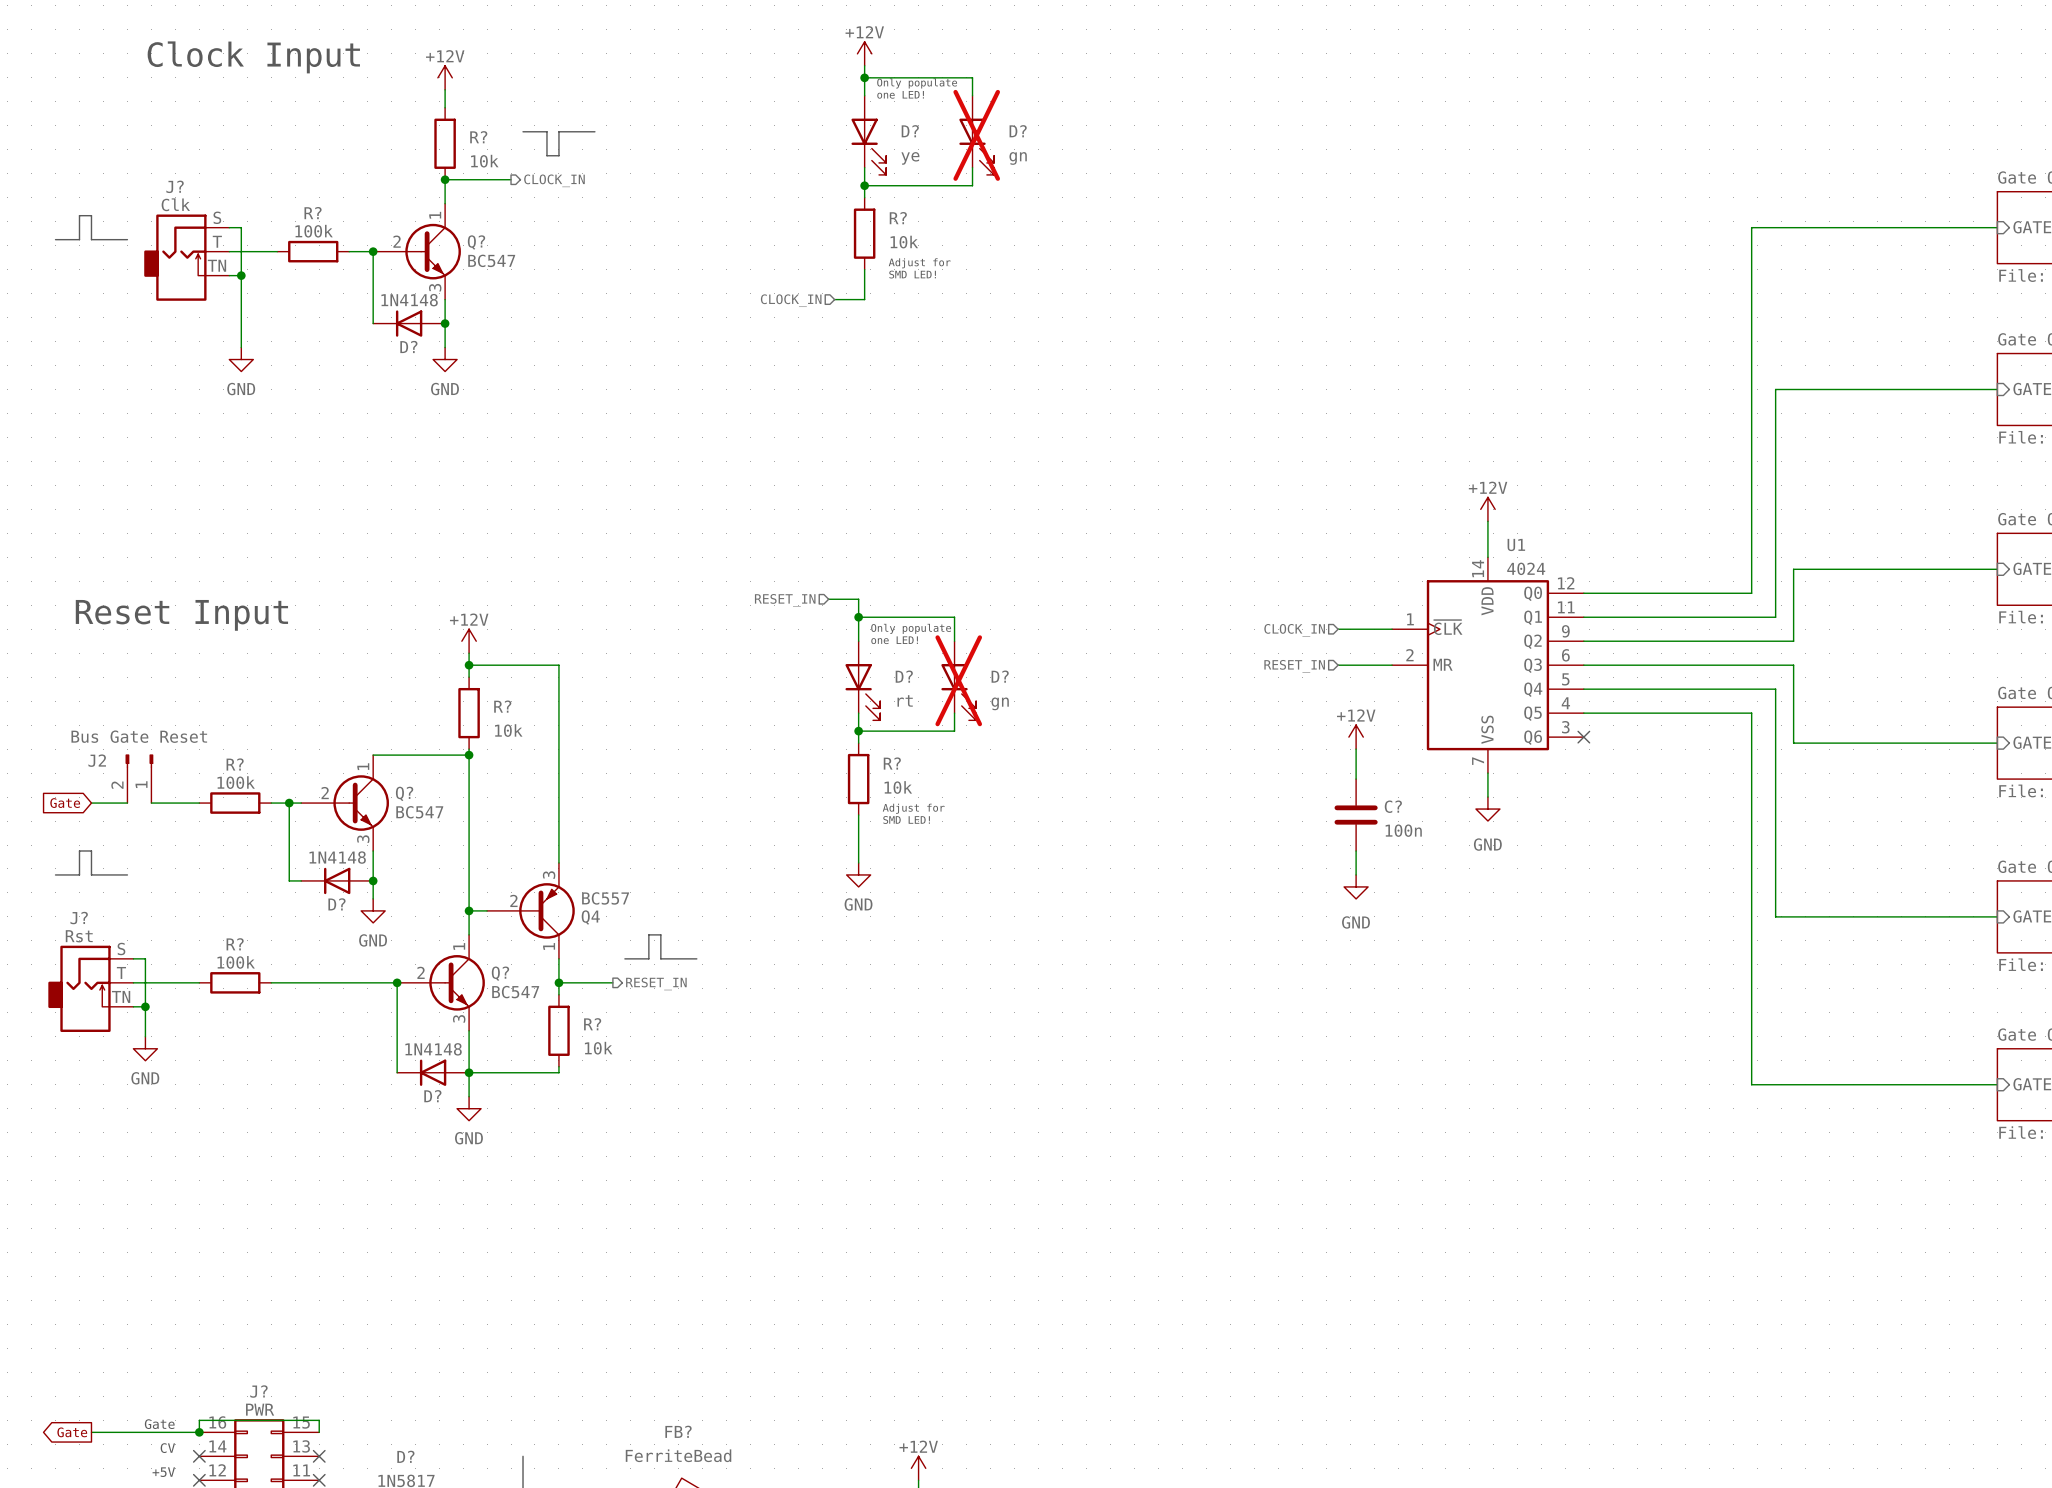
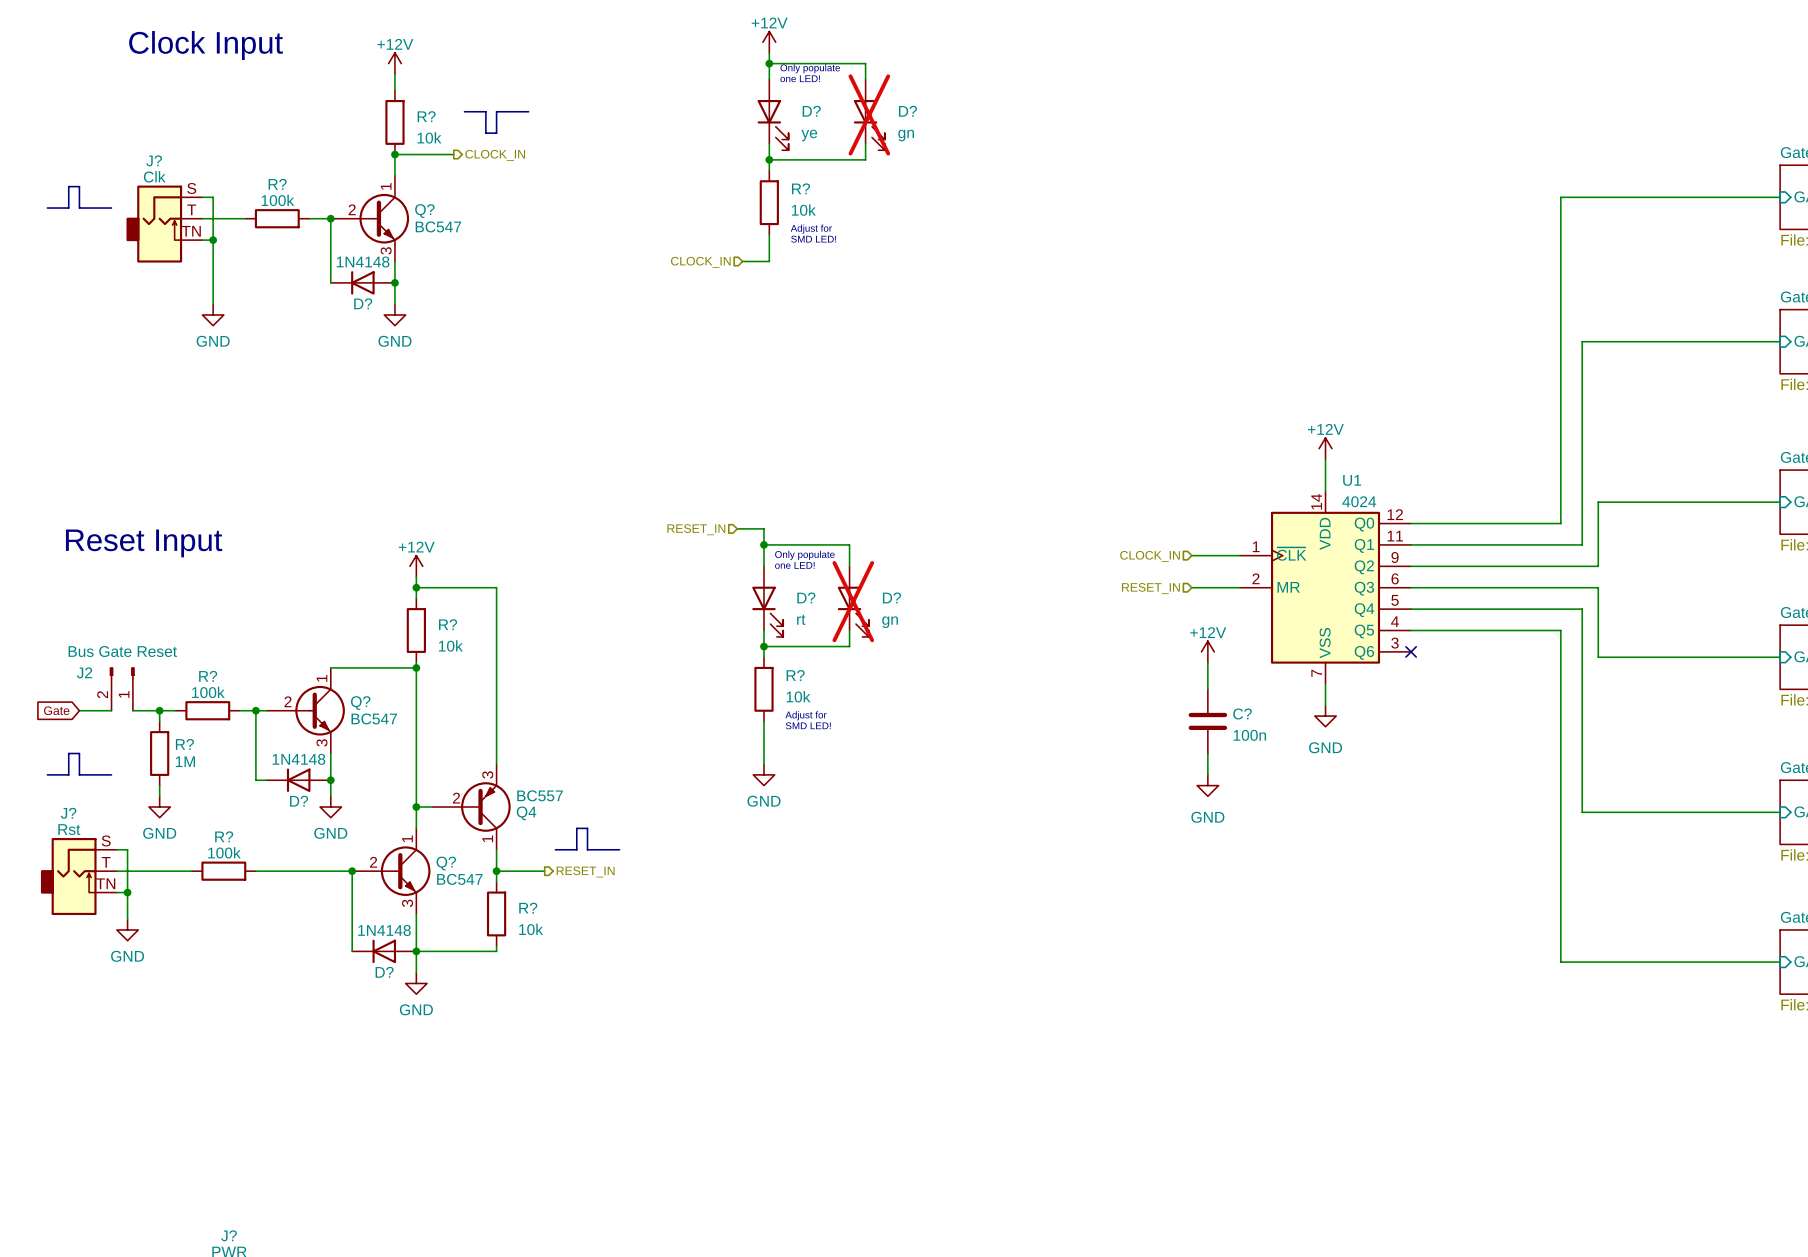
wire: none -> (159, 710) (159, 721)
junction: none -> (159, 710)
R?: none -> 1M (159, 753)
wire: none -> (159, 785) (159, 796)
power symbol: none -> GND (159, 806)
R? position: (235, 982) -> (223, 871)

